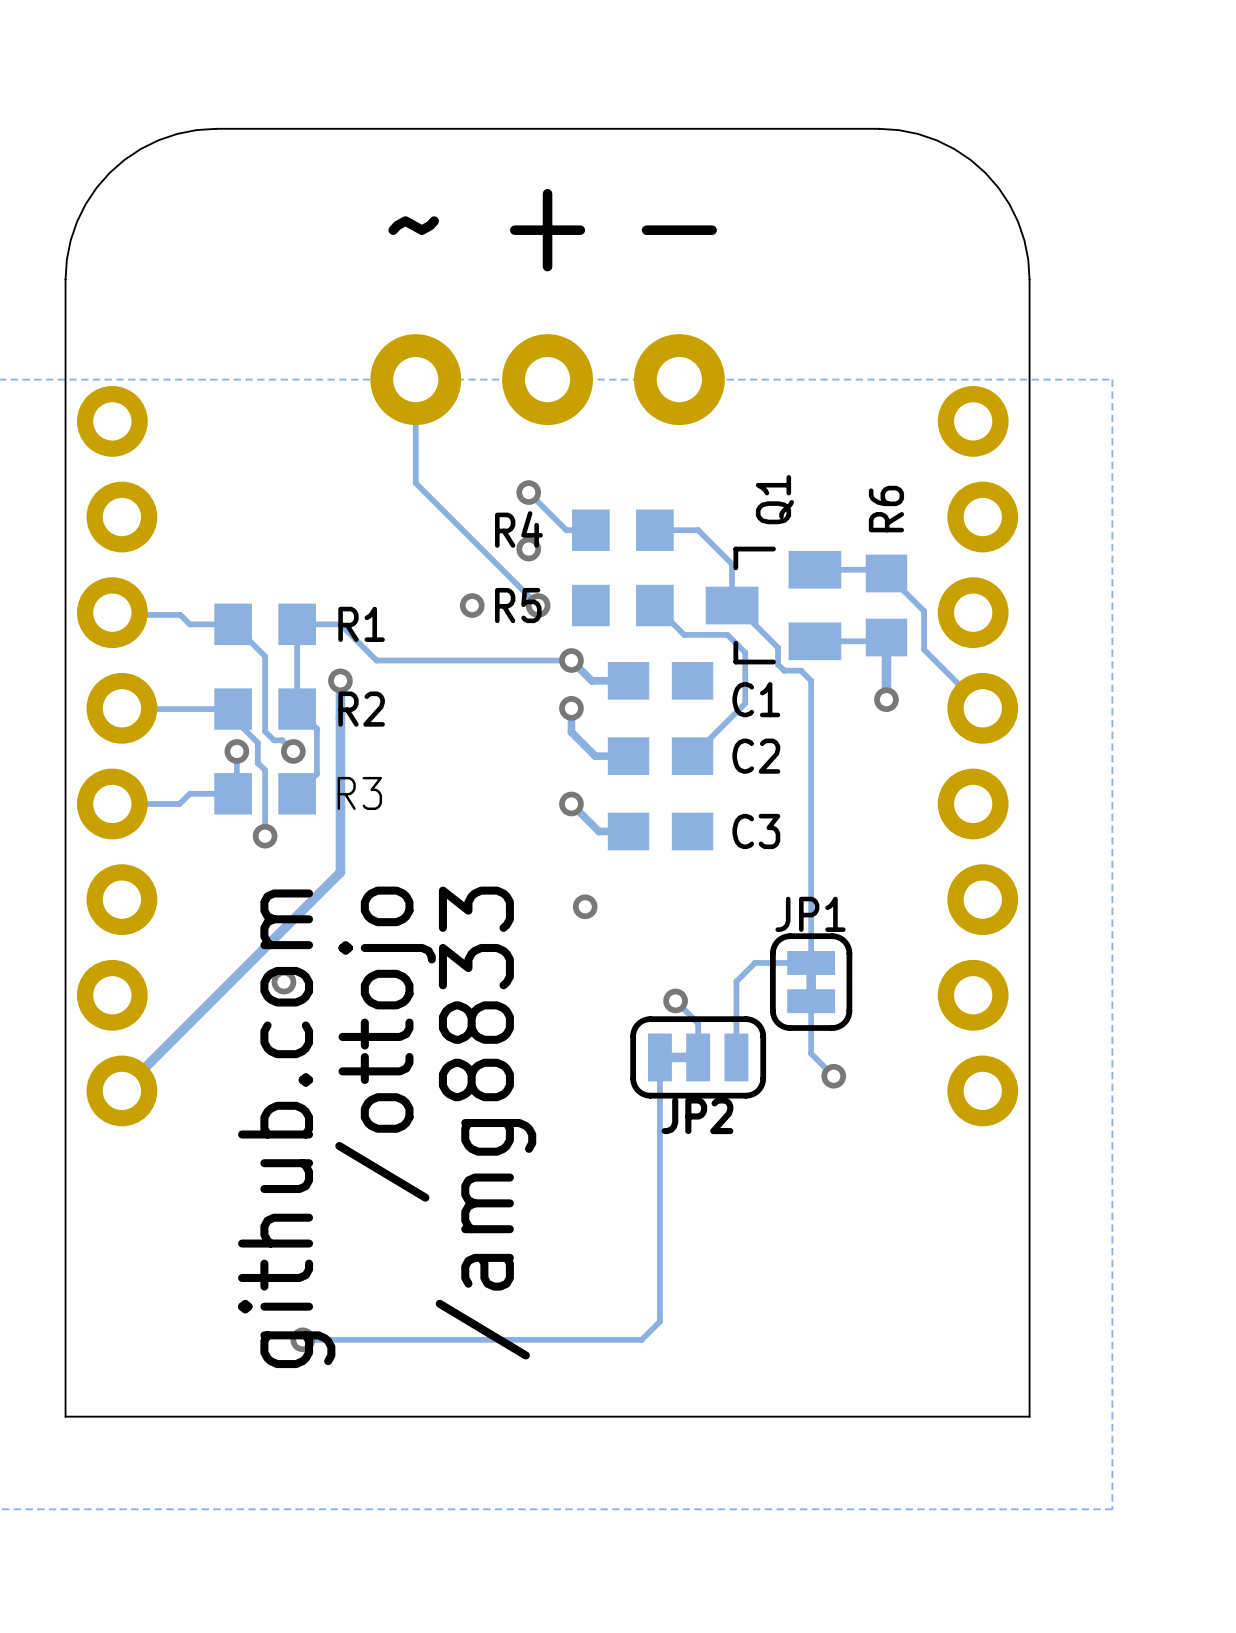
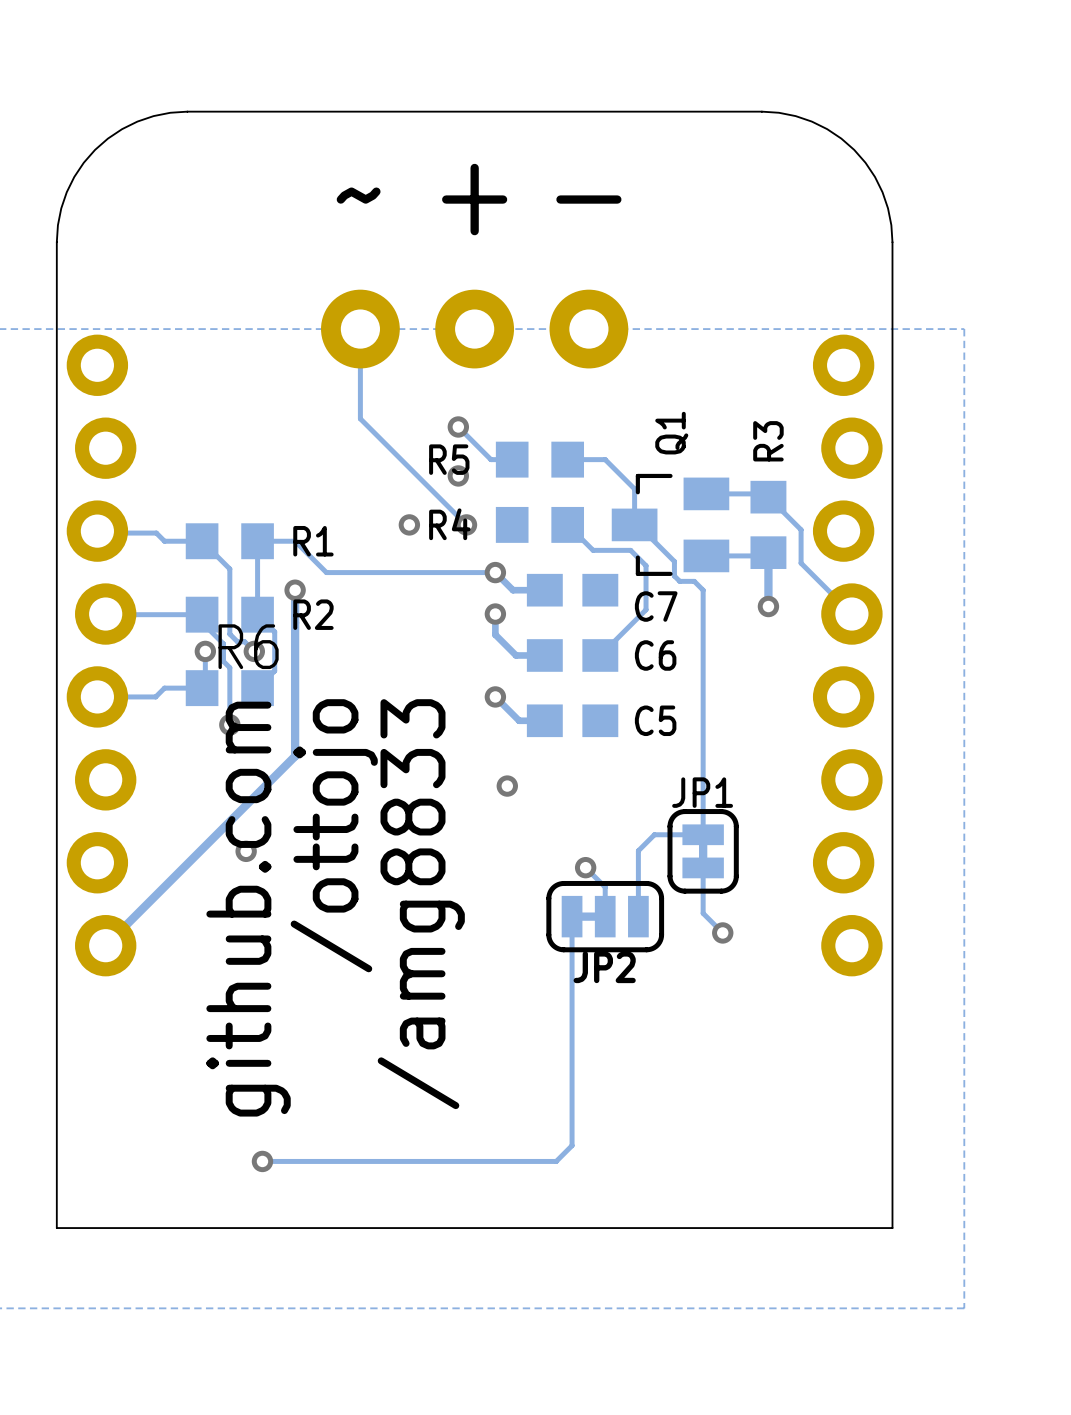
R6 name: R6 (886, 509) -> R3 (768, 441)
R4 name: R4 (518, 529) -> R5 (449, 459)
R5 name: R5 (518, 605) -> R4 (449, 524)
C1 name: C1 (756, 699) -> C7 (656, 606)
C2 name: C2 (756, 756) -> C6 (655, 655)
R3 name: R3 (359, 793) -> R6 (248, 646)
C3 name: C3 (756, 831) -> C5 (655, 720)
text position: /ottojo (385, 1044) -> /ottojo (334, 835)
text position: /amg8833 (485, 1123) -> /amg8833 (421, 904)
text position: github.com (286, 1128) -> github.com (248, 909)

